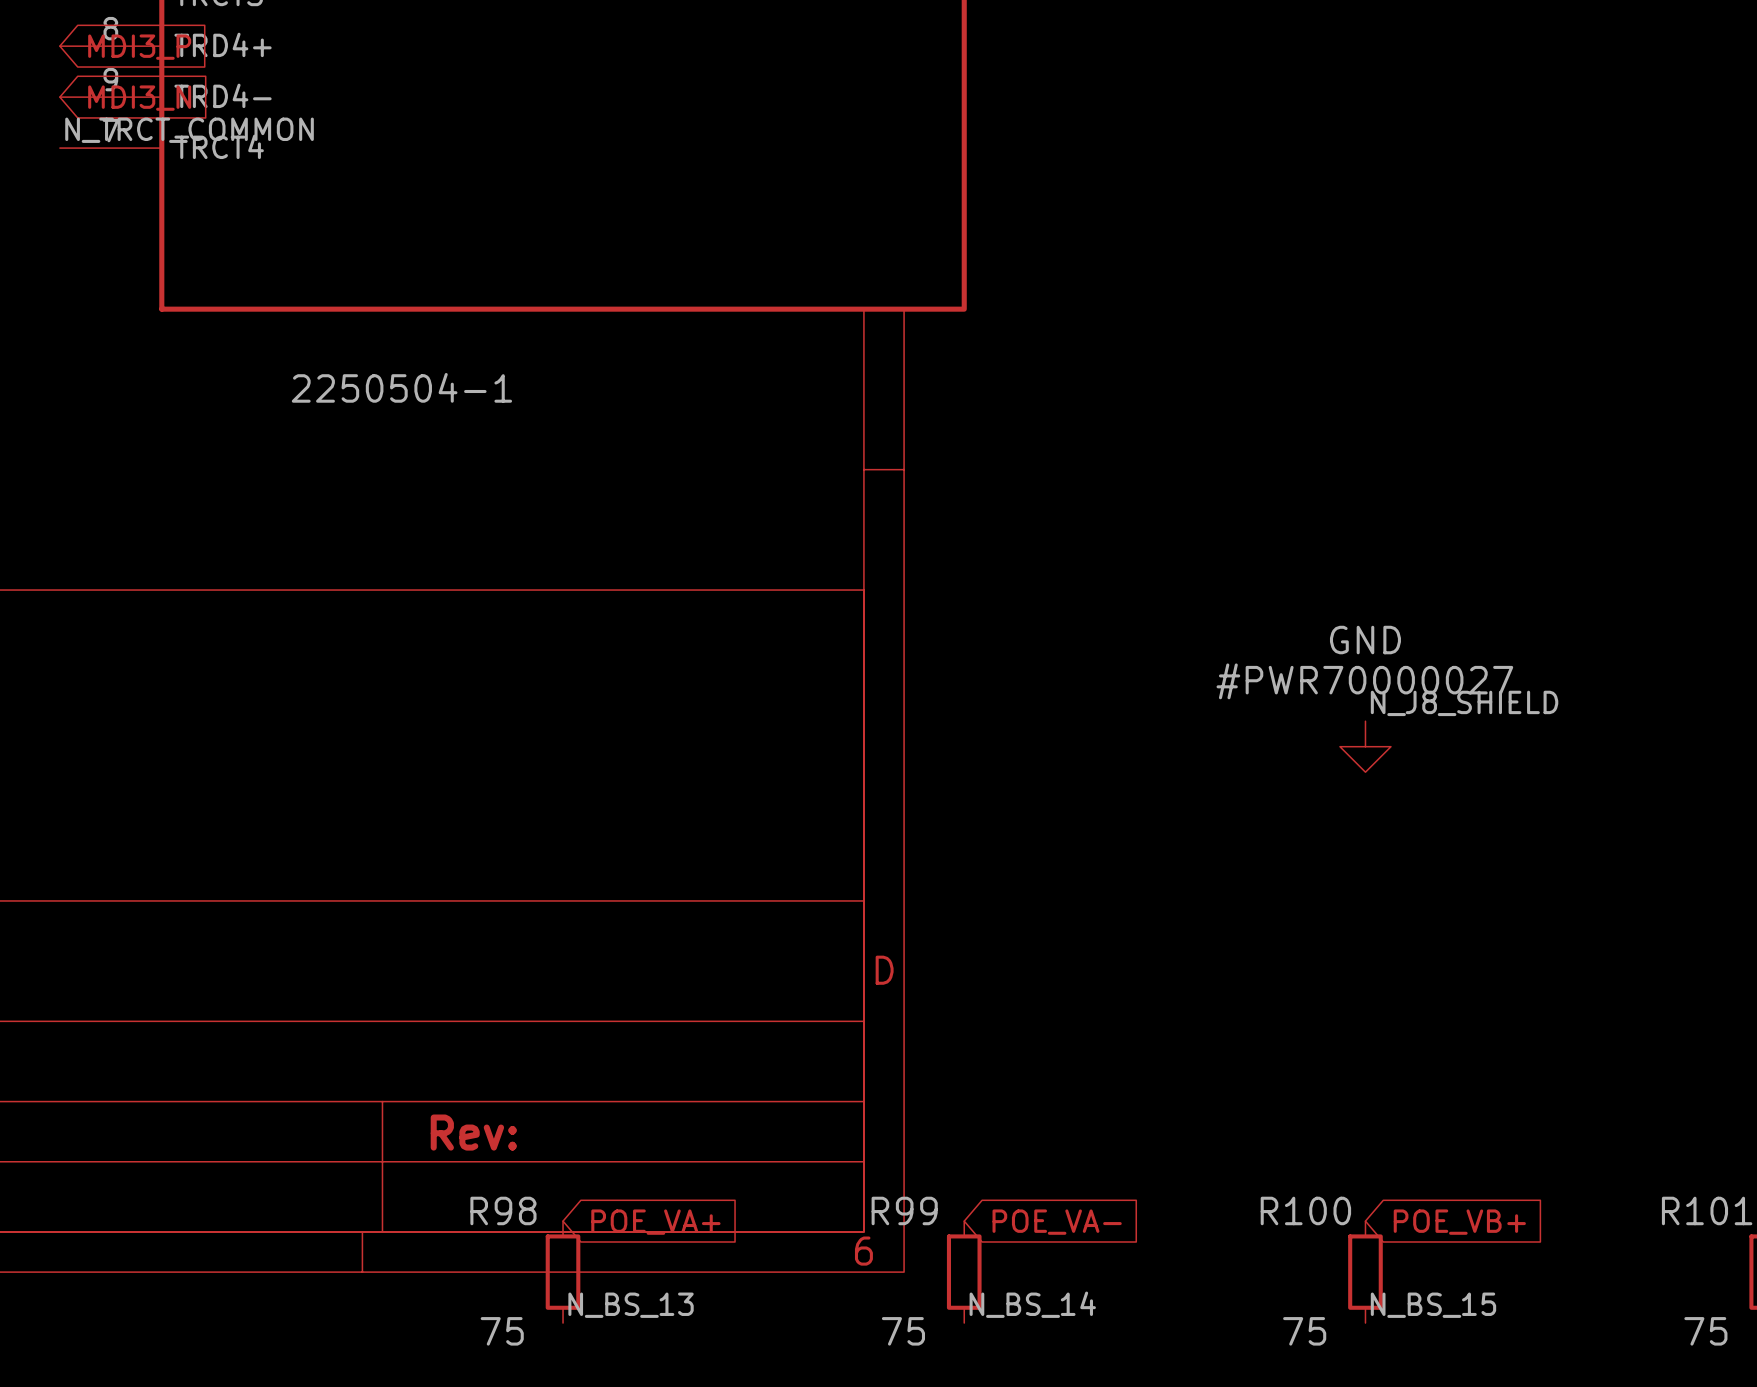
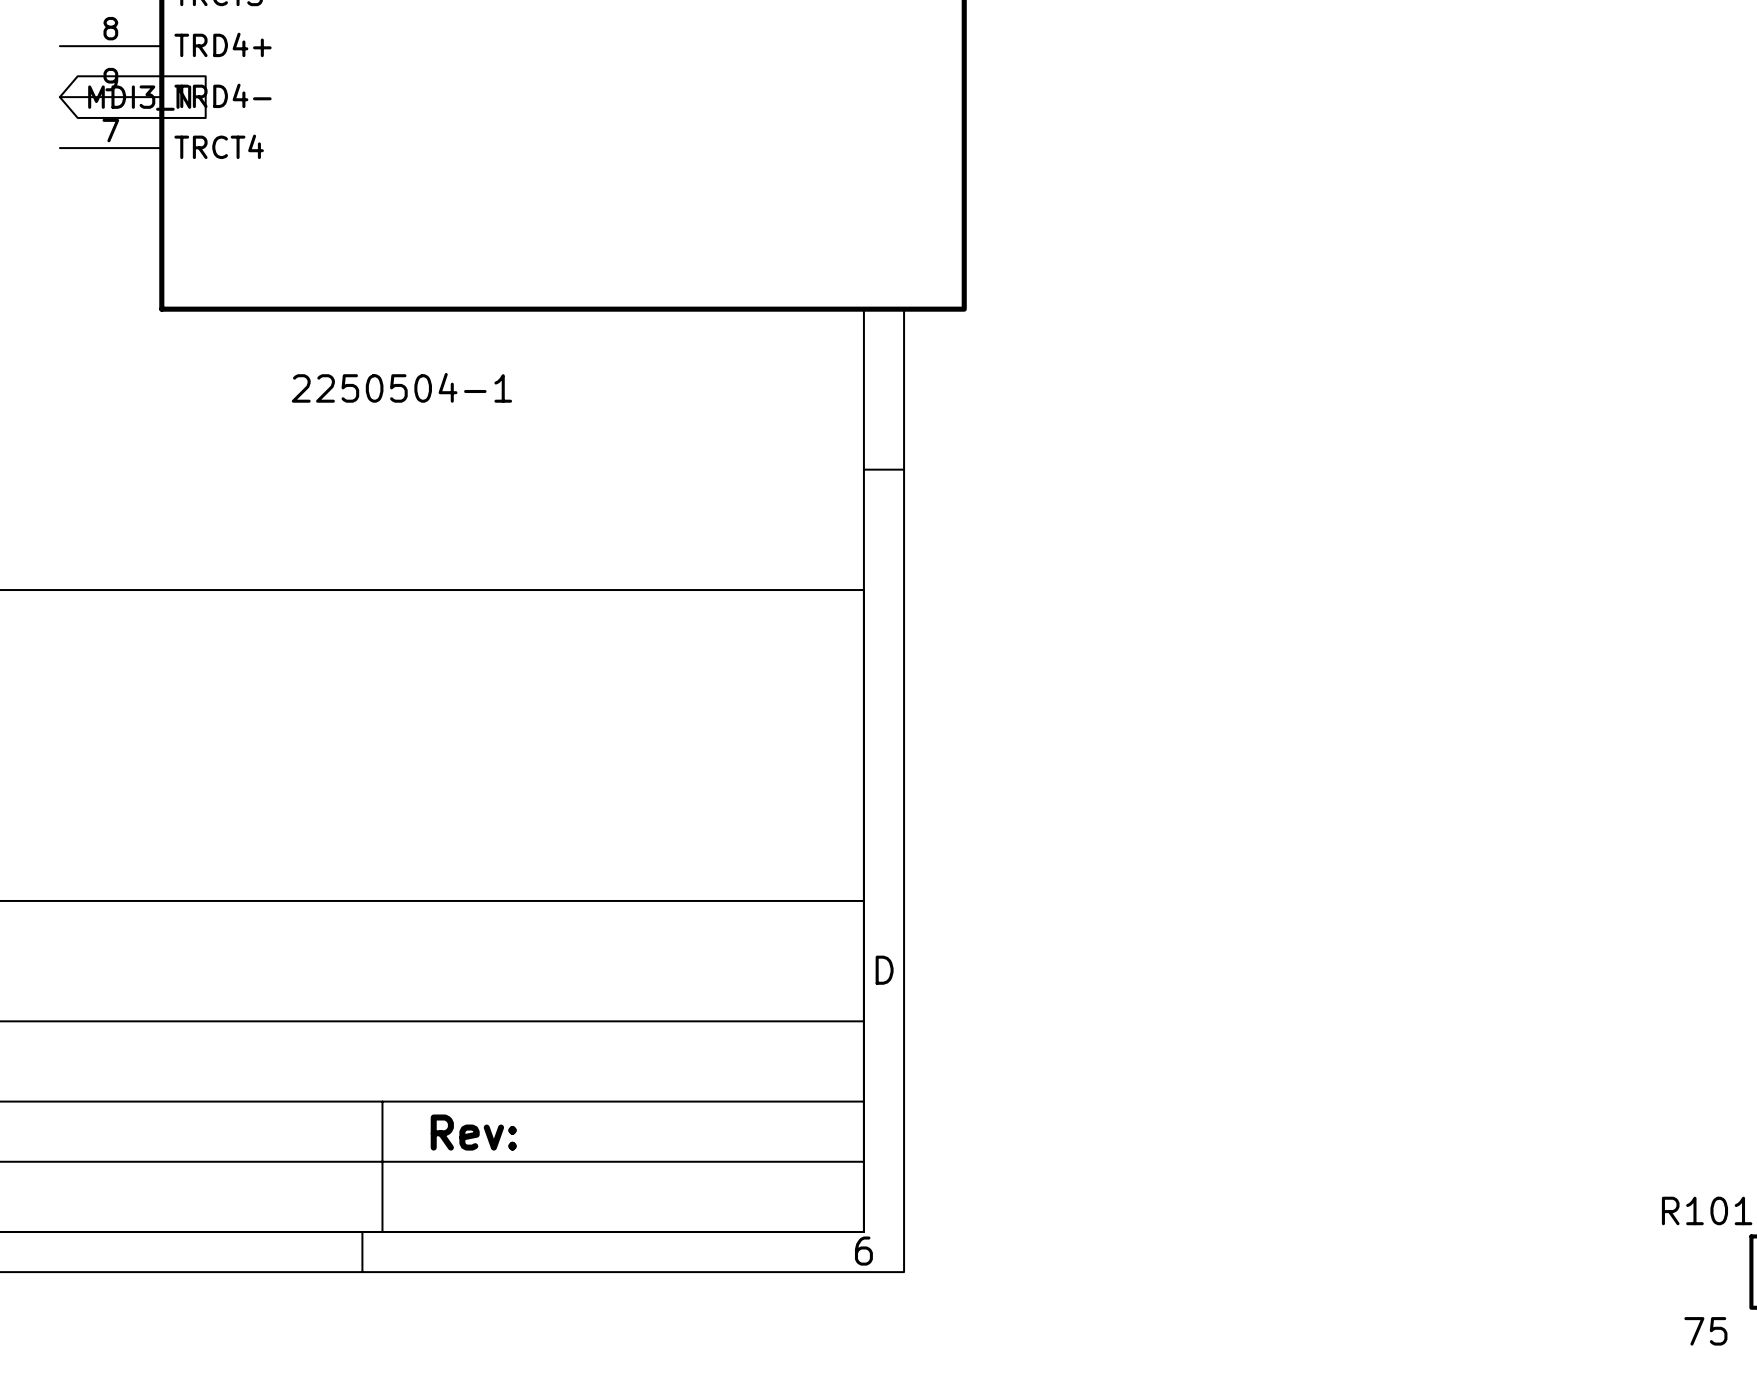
global label: MDI3_P (139, 47) -> none
label: N_TRCT_COMMON (189, 130) -> none
label: N_J8_SHIELD (1464, 703) -> none
#PWR70000027: GND (1365, 746) -> none
global label: POE_VA+ (655, 1222) -> none
global label: POE_VA- (1057, 1222) -> none
global label: POE_VB+ (1459, 1222) -> none
R98: 75 (563, 1272) -> none
R99: 75 (964, 1272) -> none
R100: 75 (1365, 1272) -> none
label: N_BS_14 (1032, 1304) -> none
label: N_BS_13 (631, 1305) -> none
label: N_BS_15 (1433, 1305) -> none

